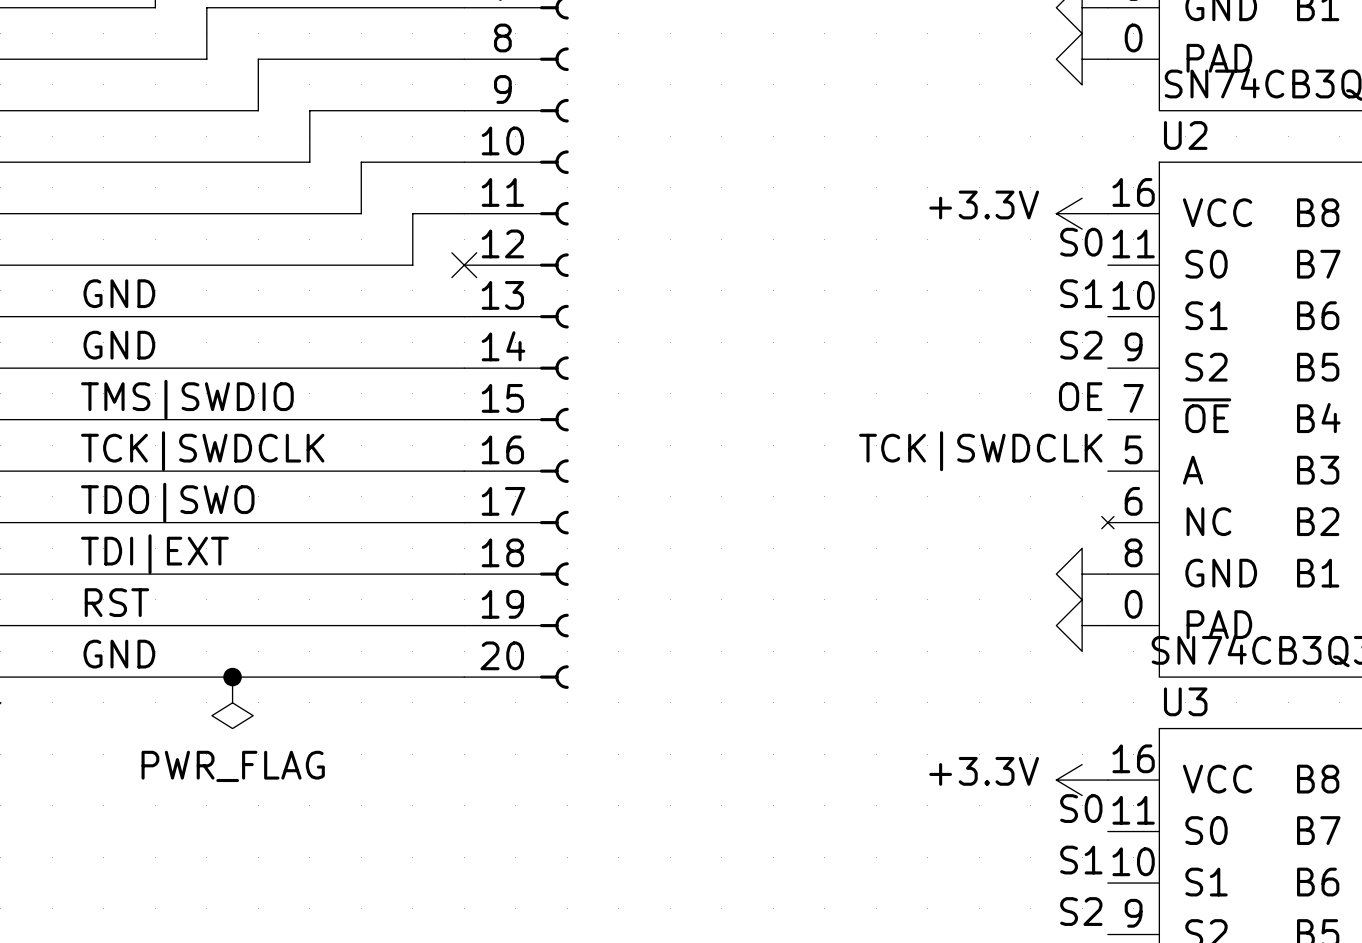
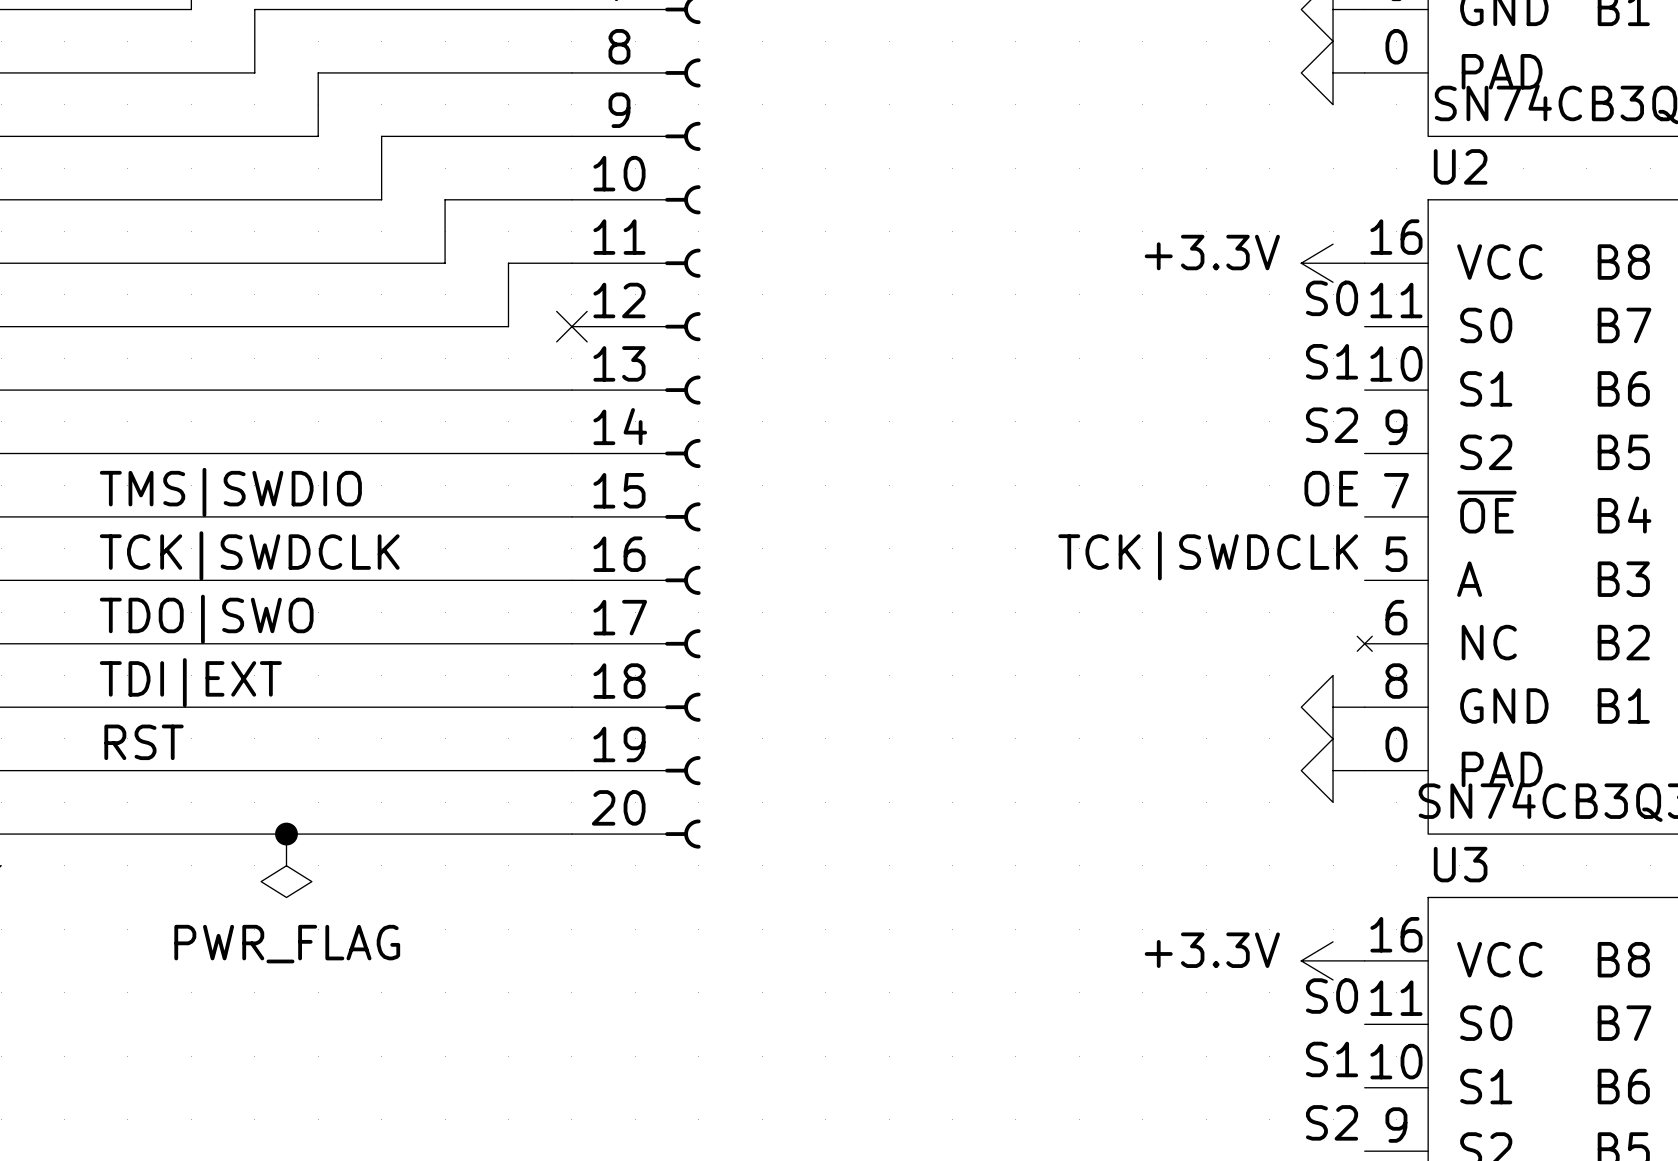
label: GND (119, 293) -> none
label: GND (119, 345) -> none
label: GND (119, 654) -> none

